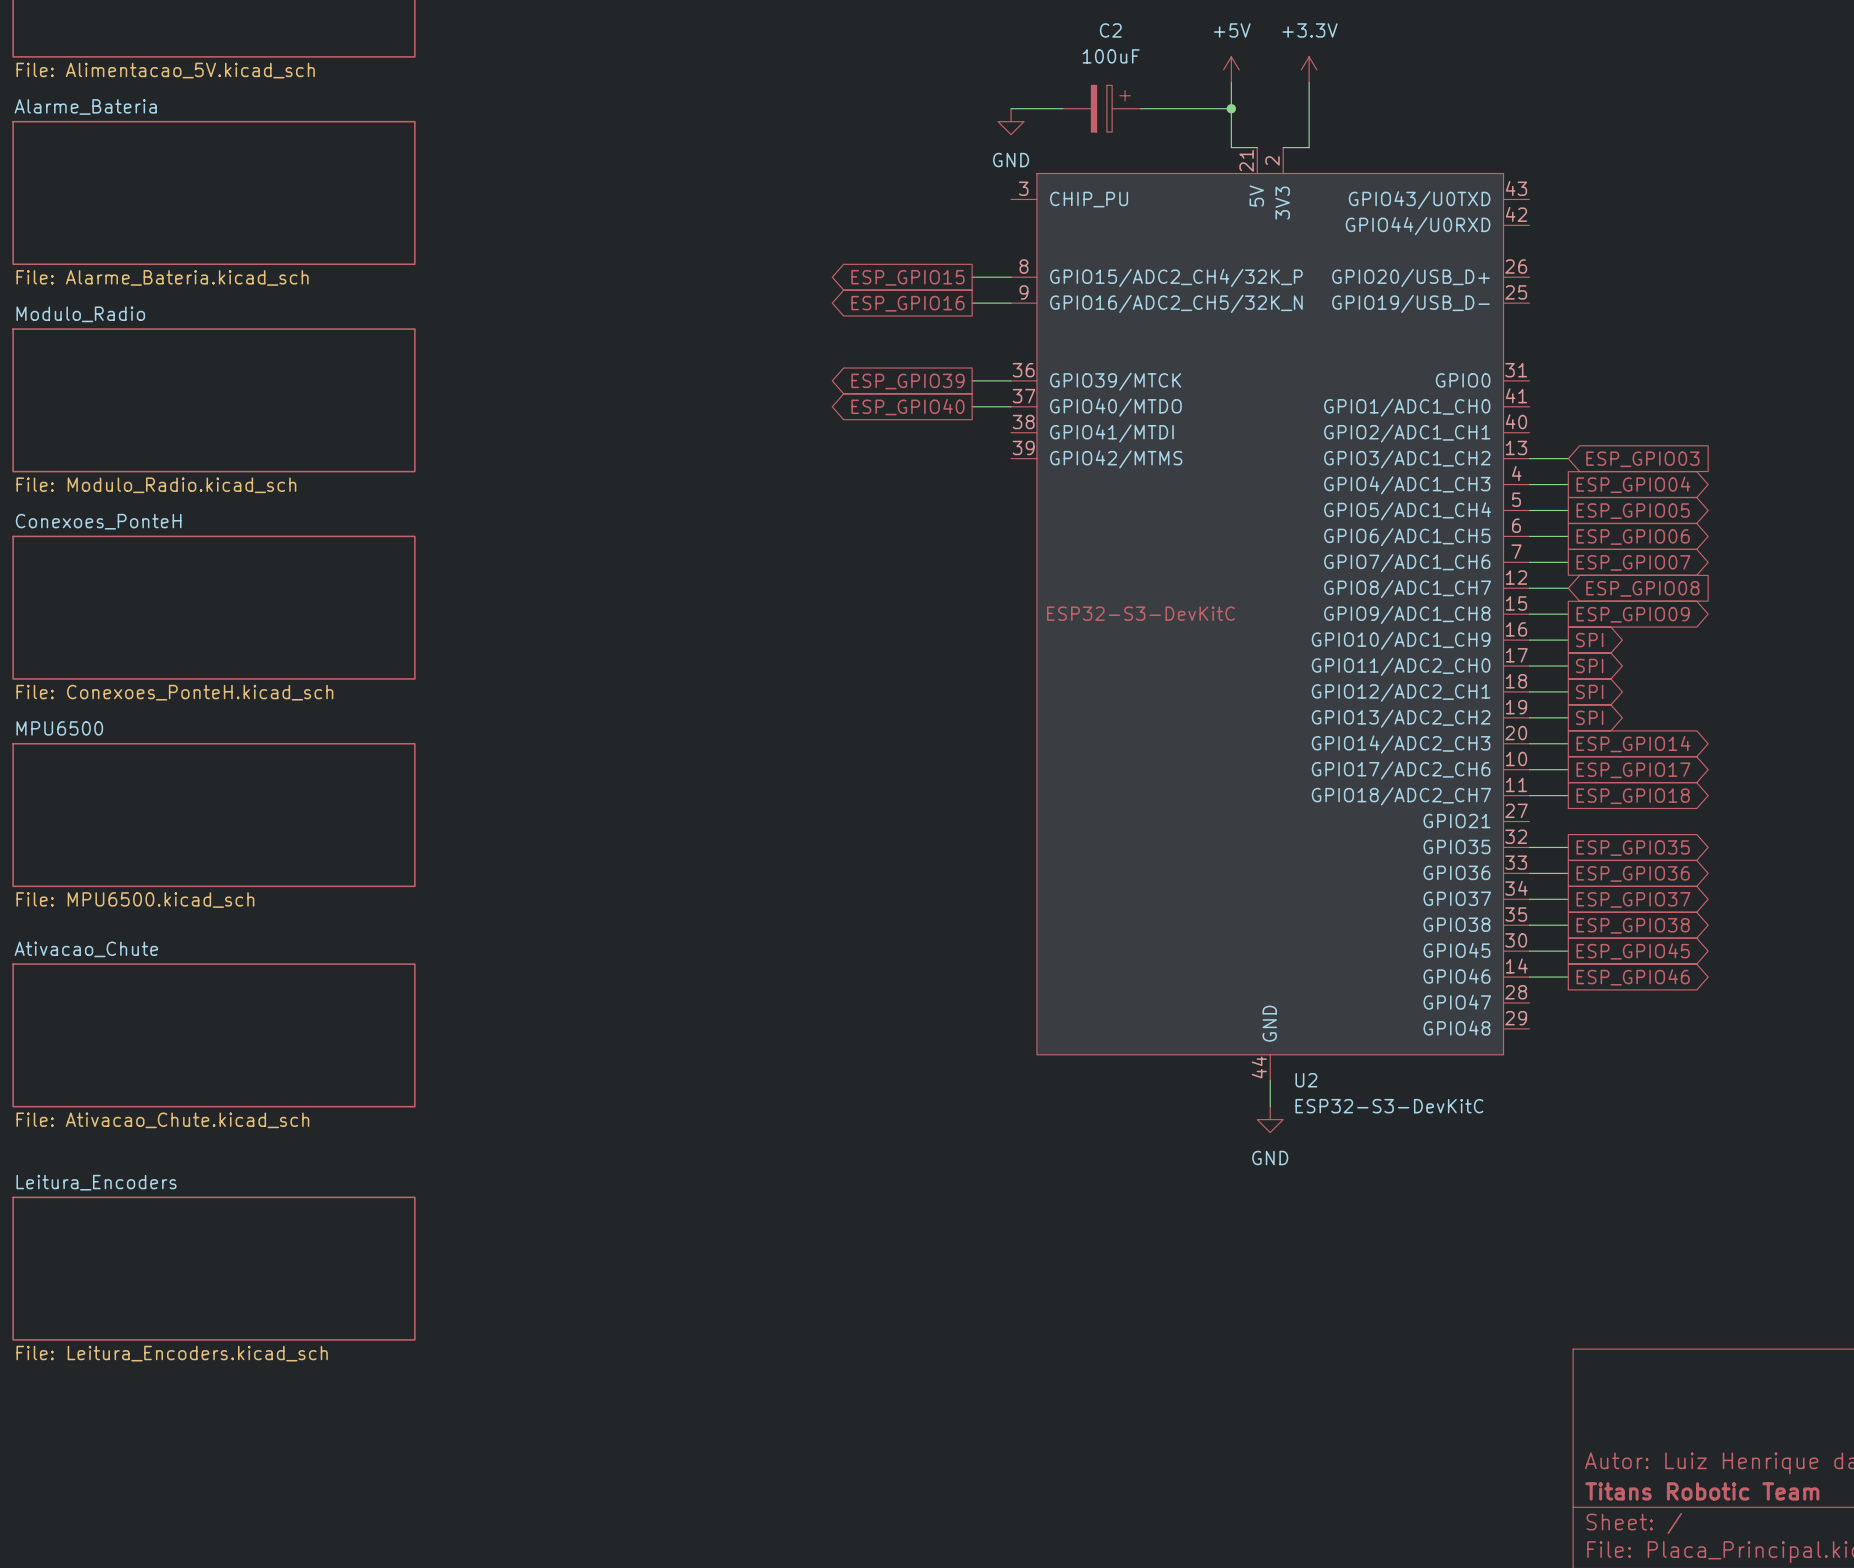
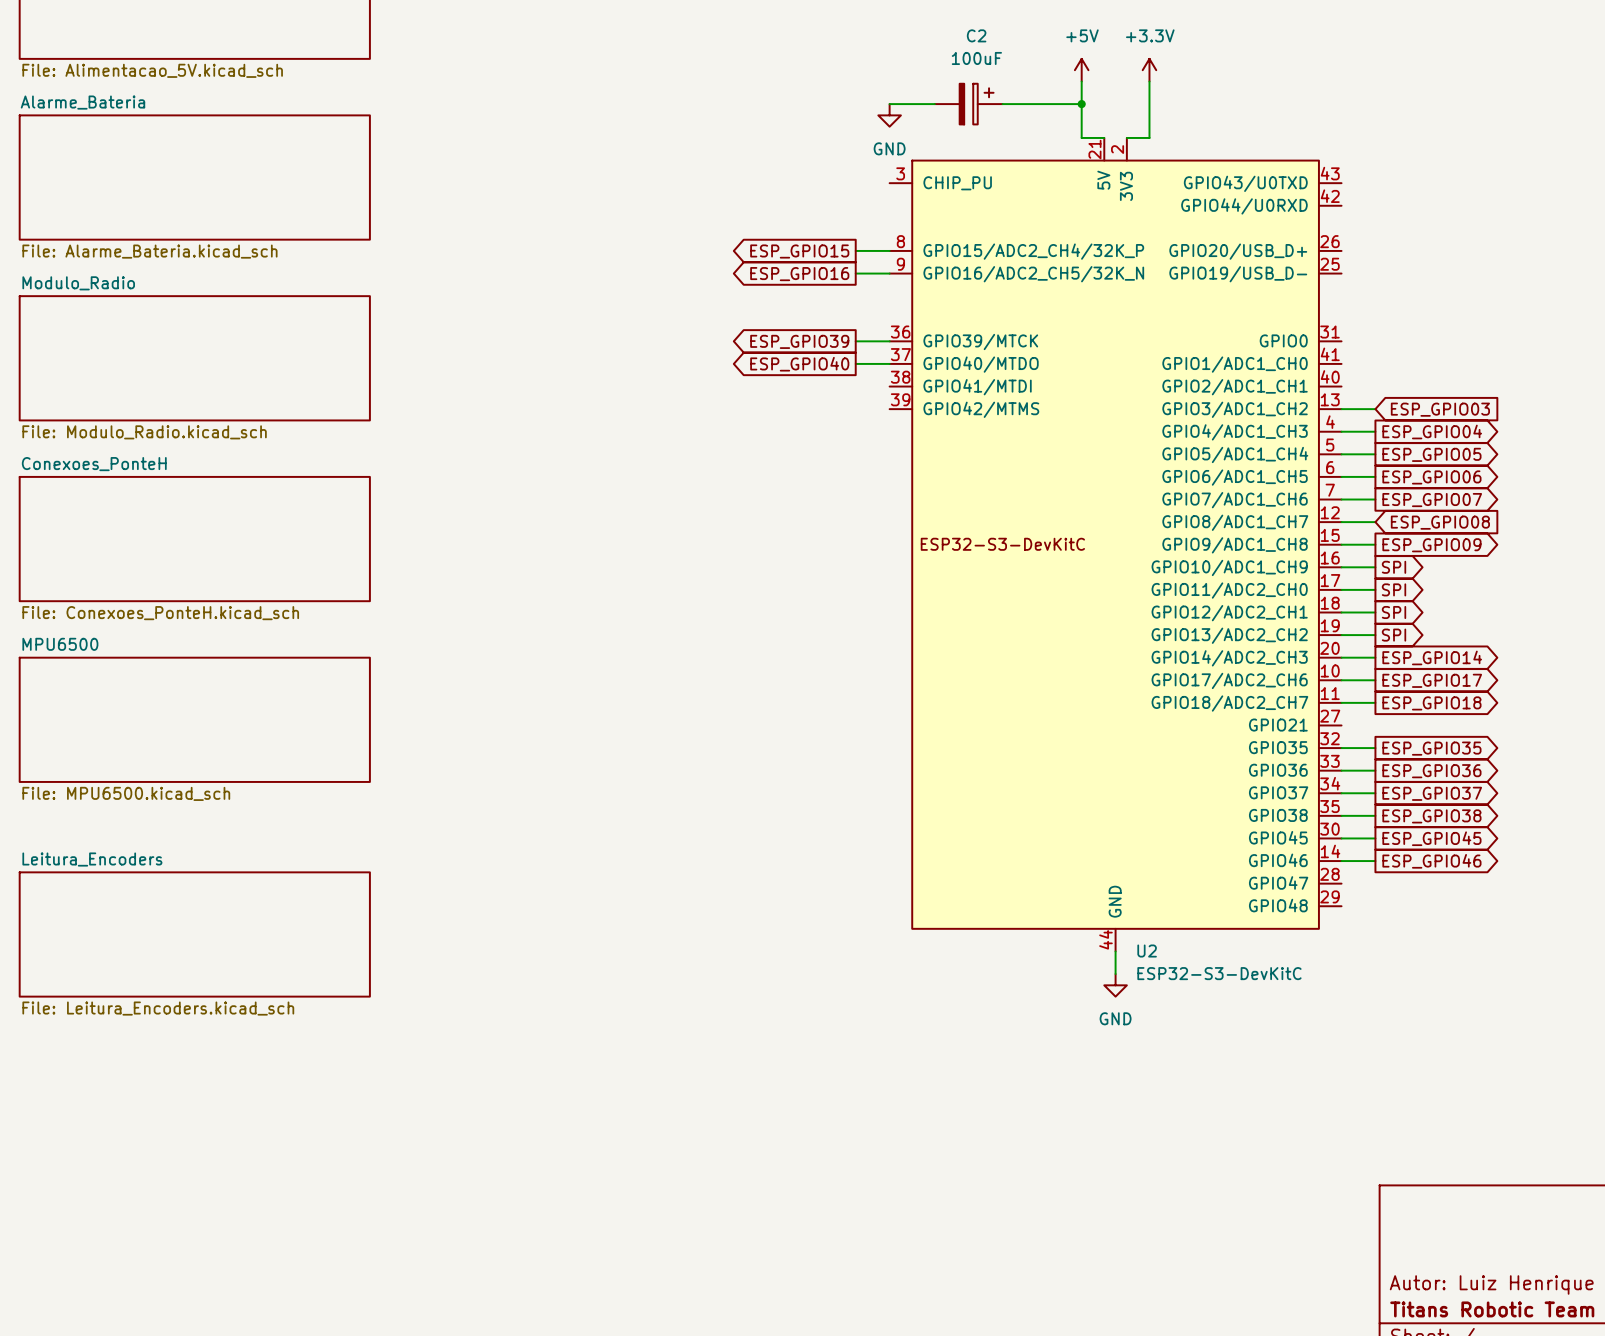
sheet Ativacao_Chute: File: Ativacao_Chute.kicad_sch (213, 1035) -> none
sheet Leitura_Encoders position: (213, 1268) -> (194, 934)

